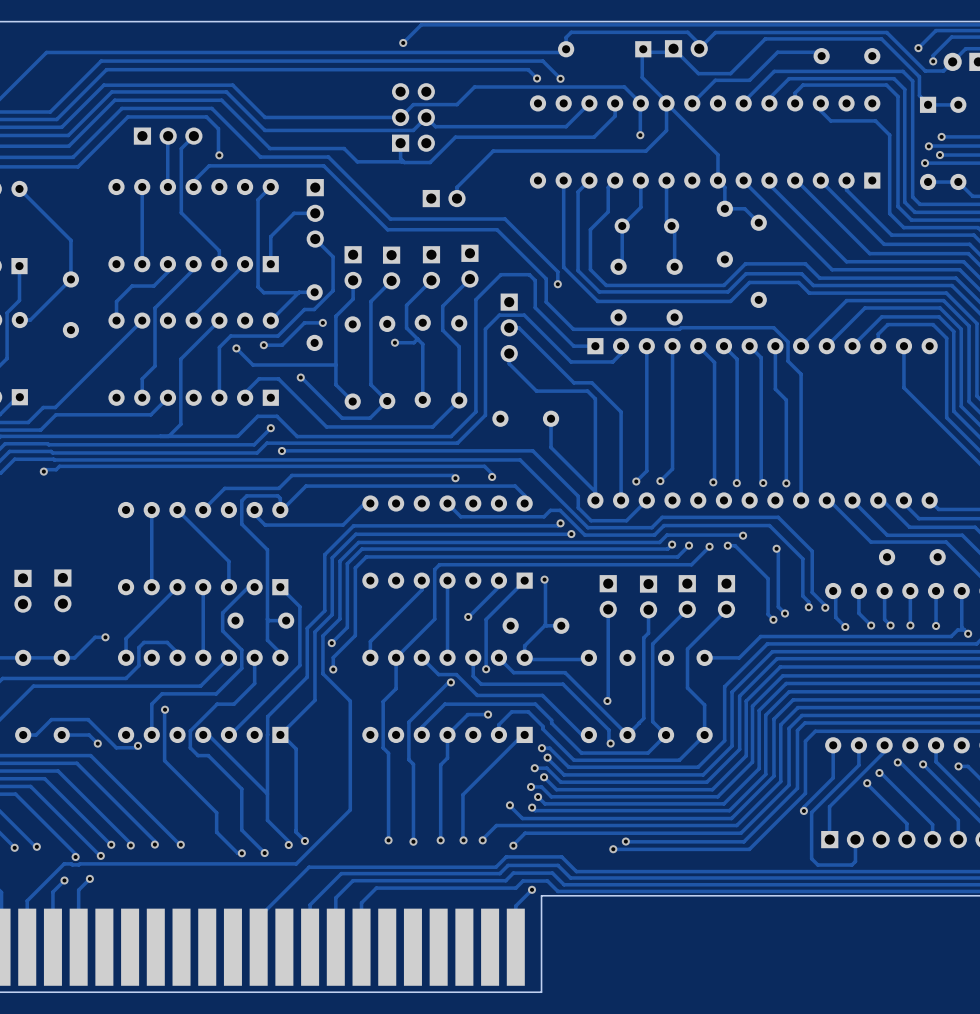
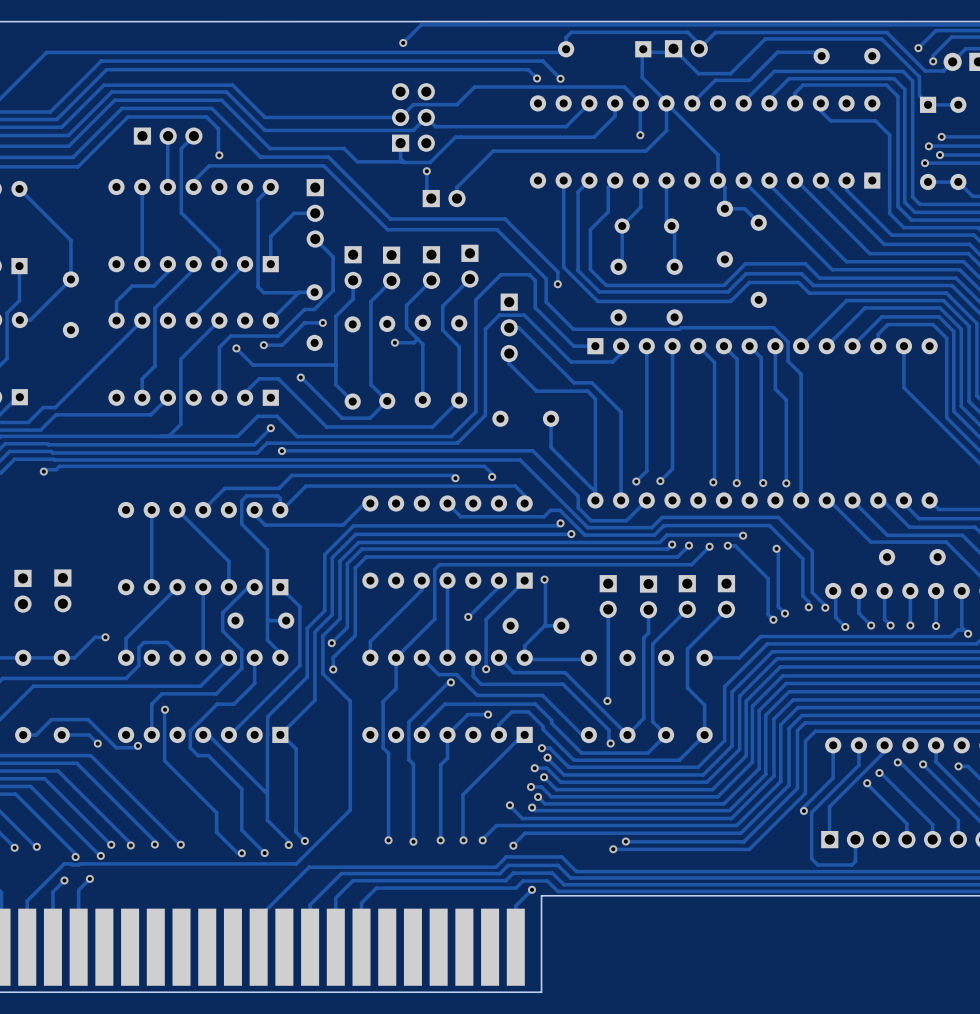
track: none -> (426, 171) (426, 194) (431, 198)
via: none -> (426, 171)

